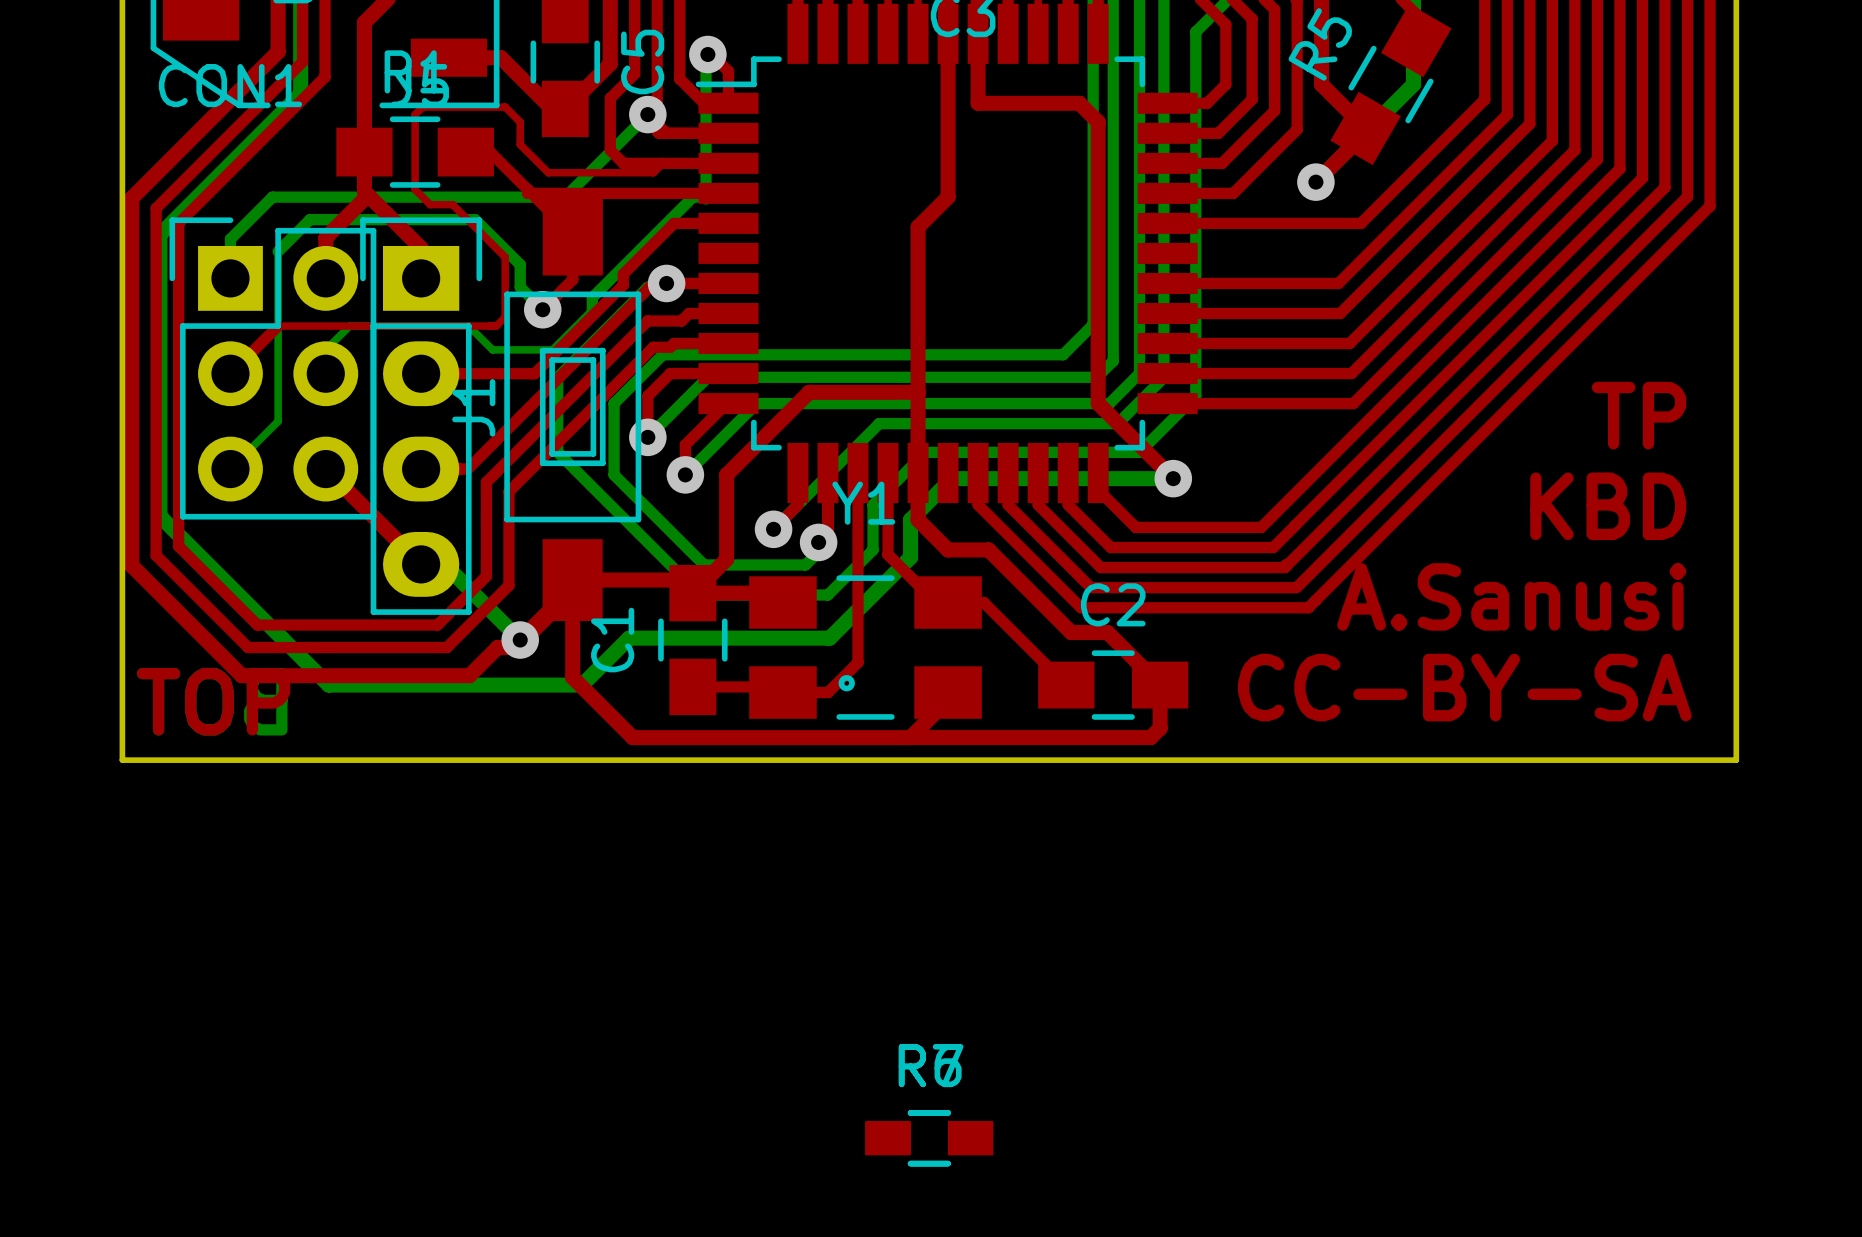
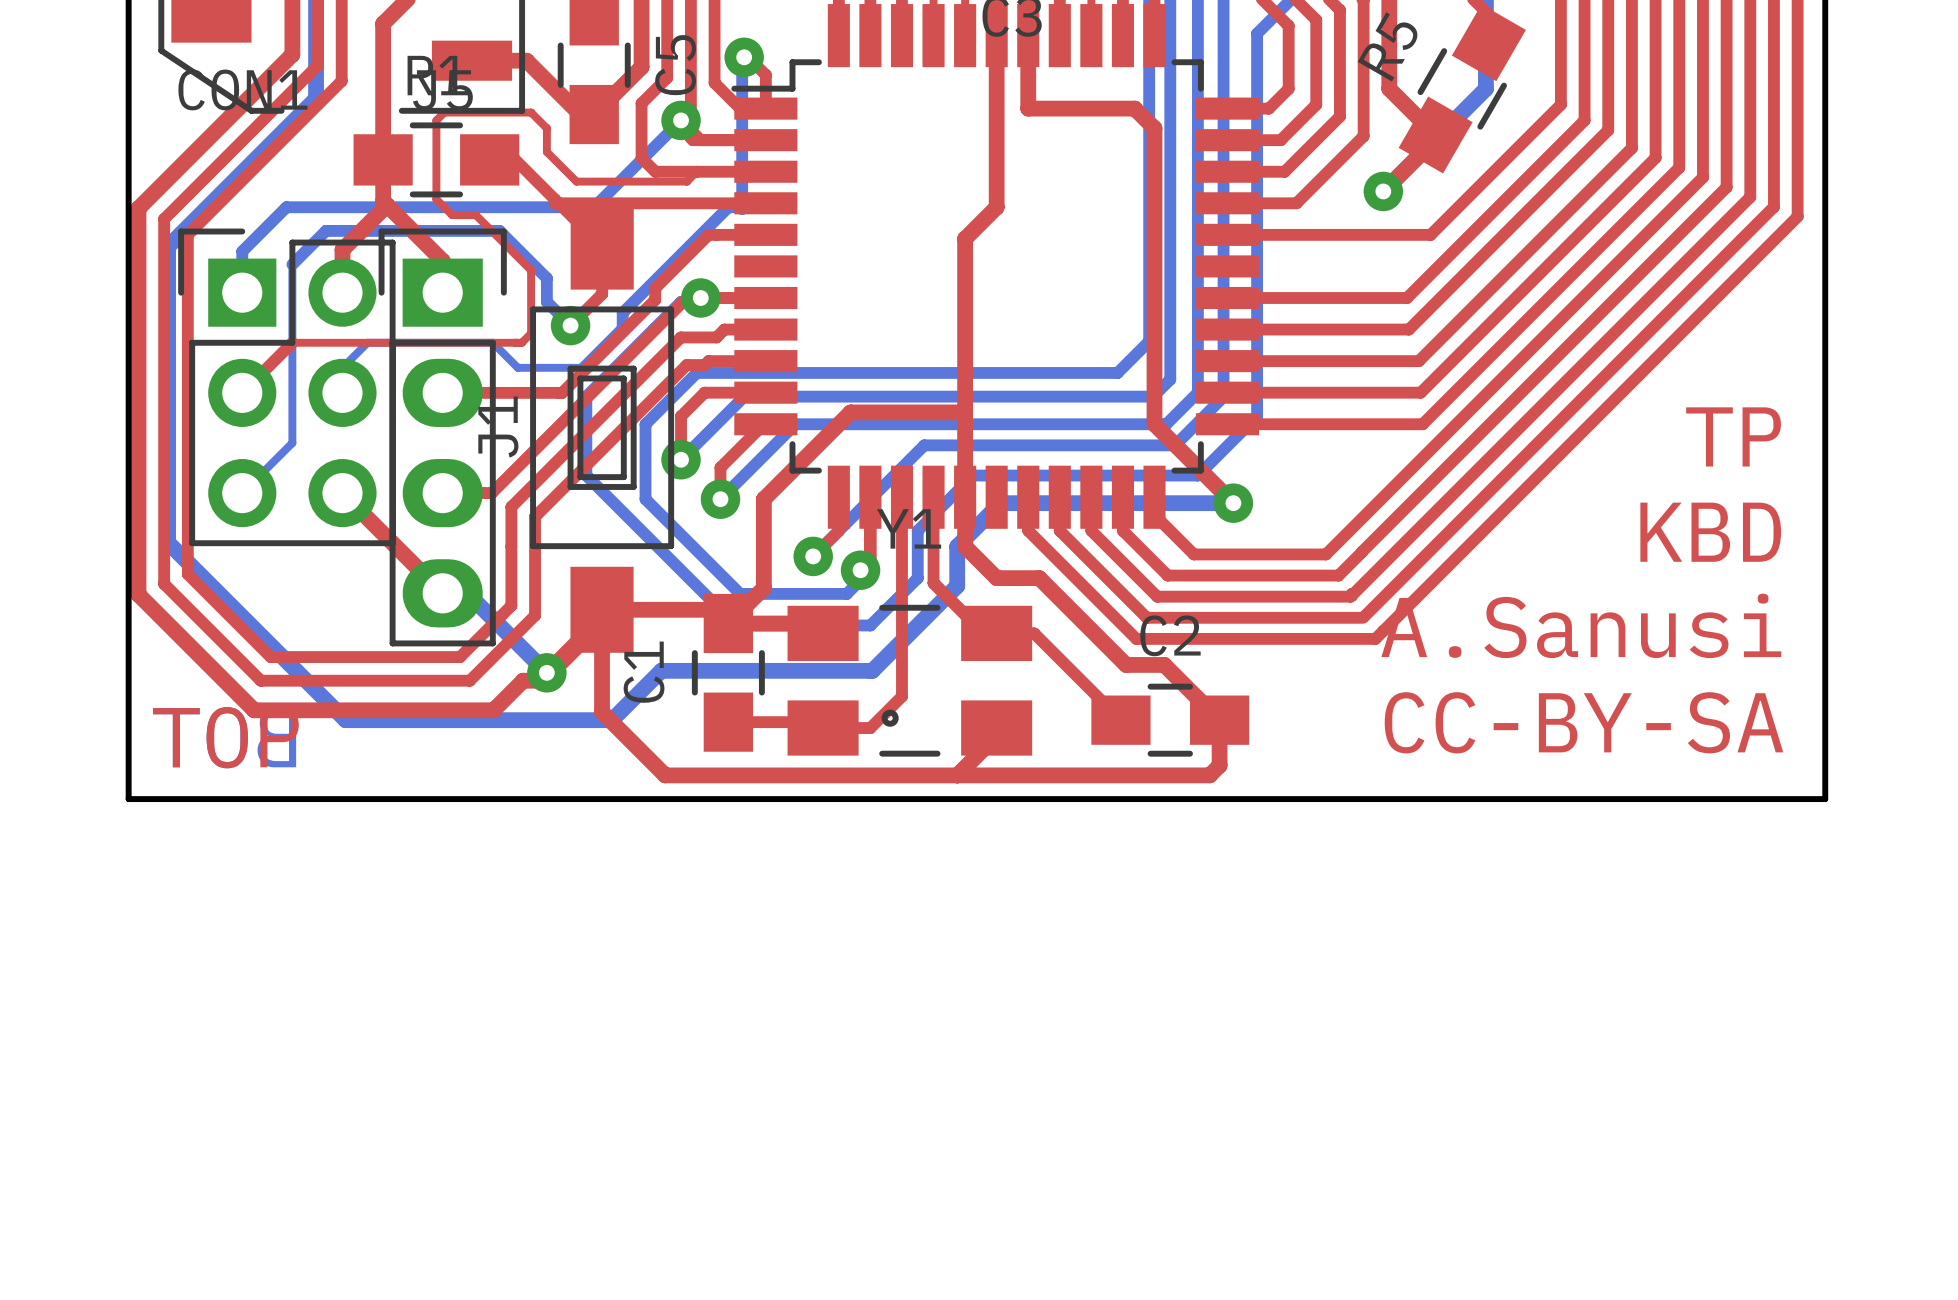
part: (929, 1138) -> none
part: (929, 1138) -> none

